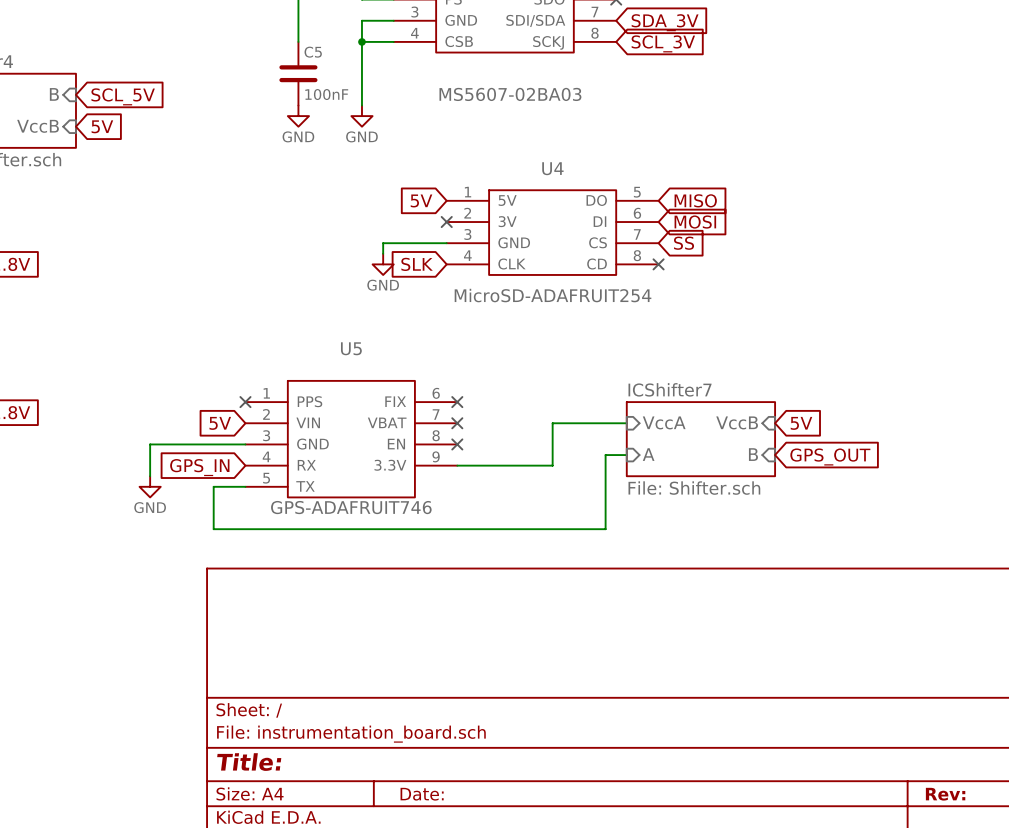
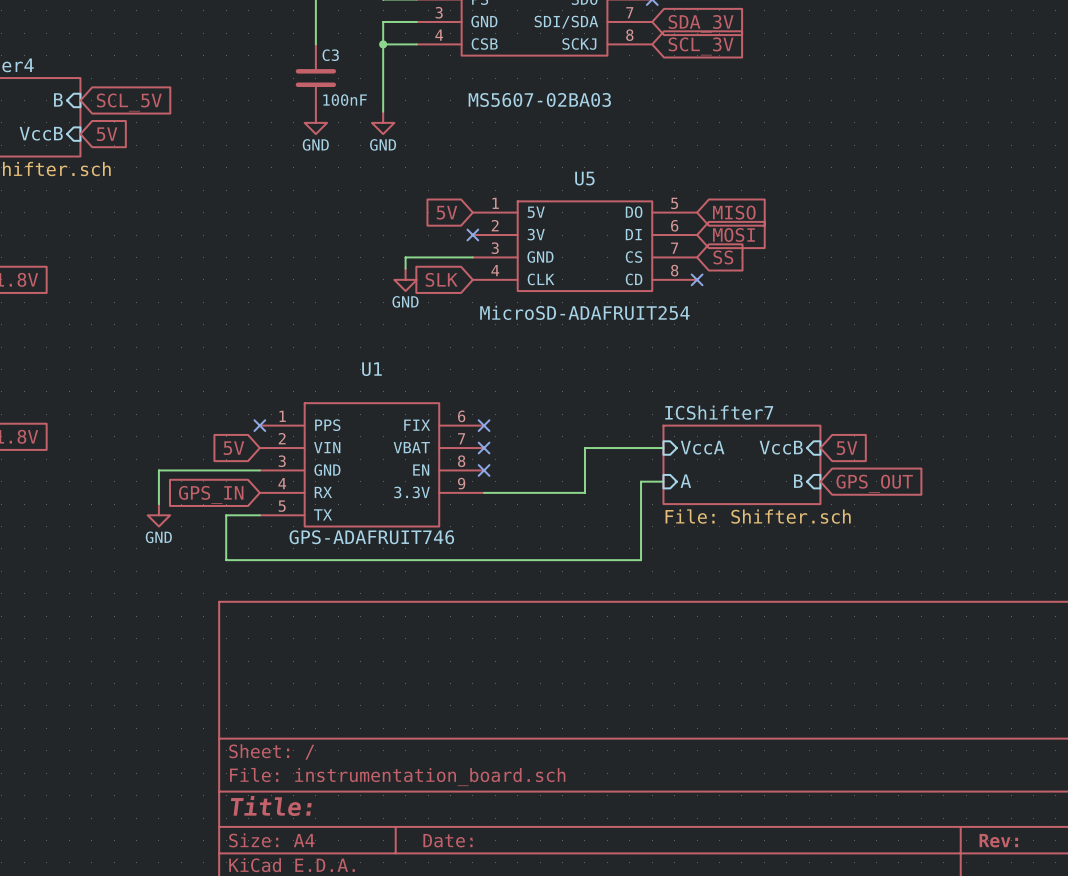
C5 name: C5 (313, 52) -> C3 (330, 55)
U4 name: U4 (552, 168) -> U5 (584, 178)
U5 name: U5 (351, 348) -> U1 (371, 369)

